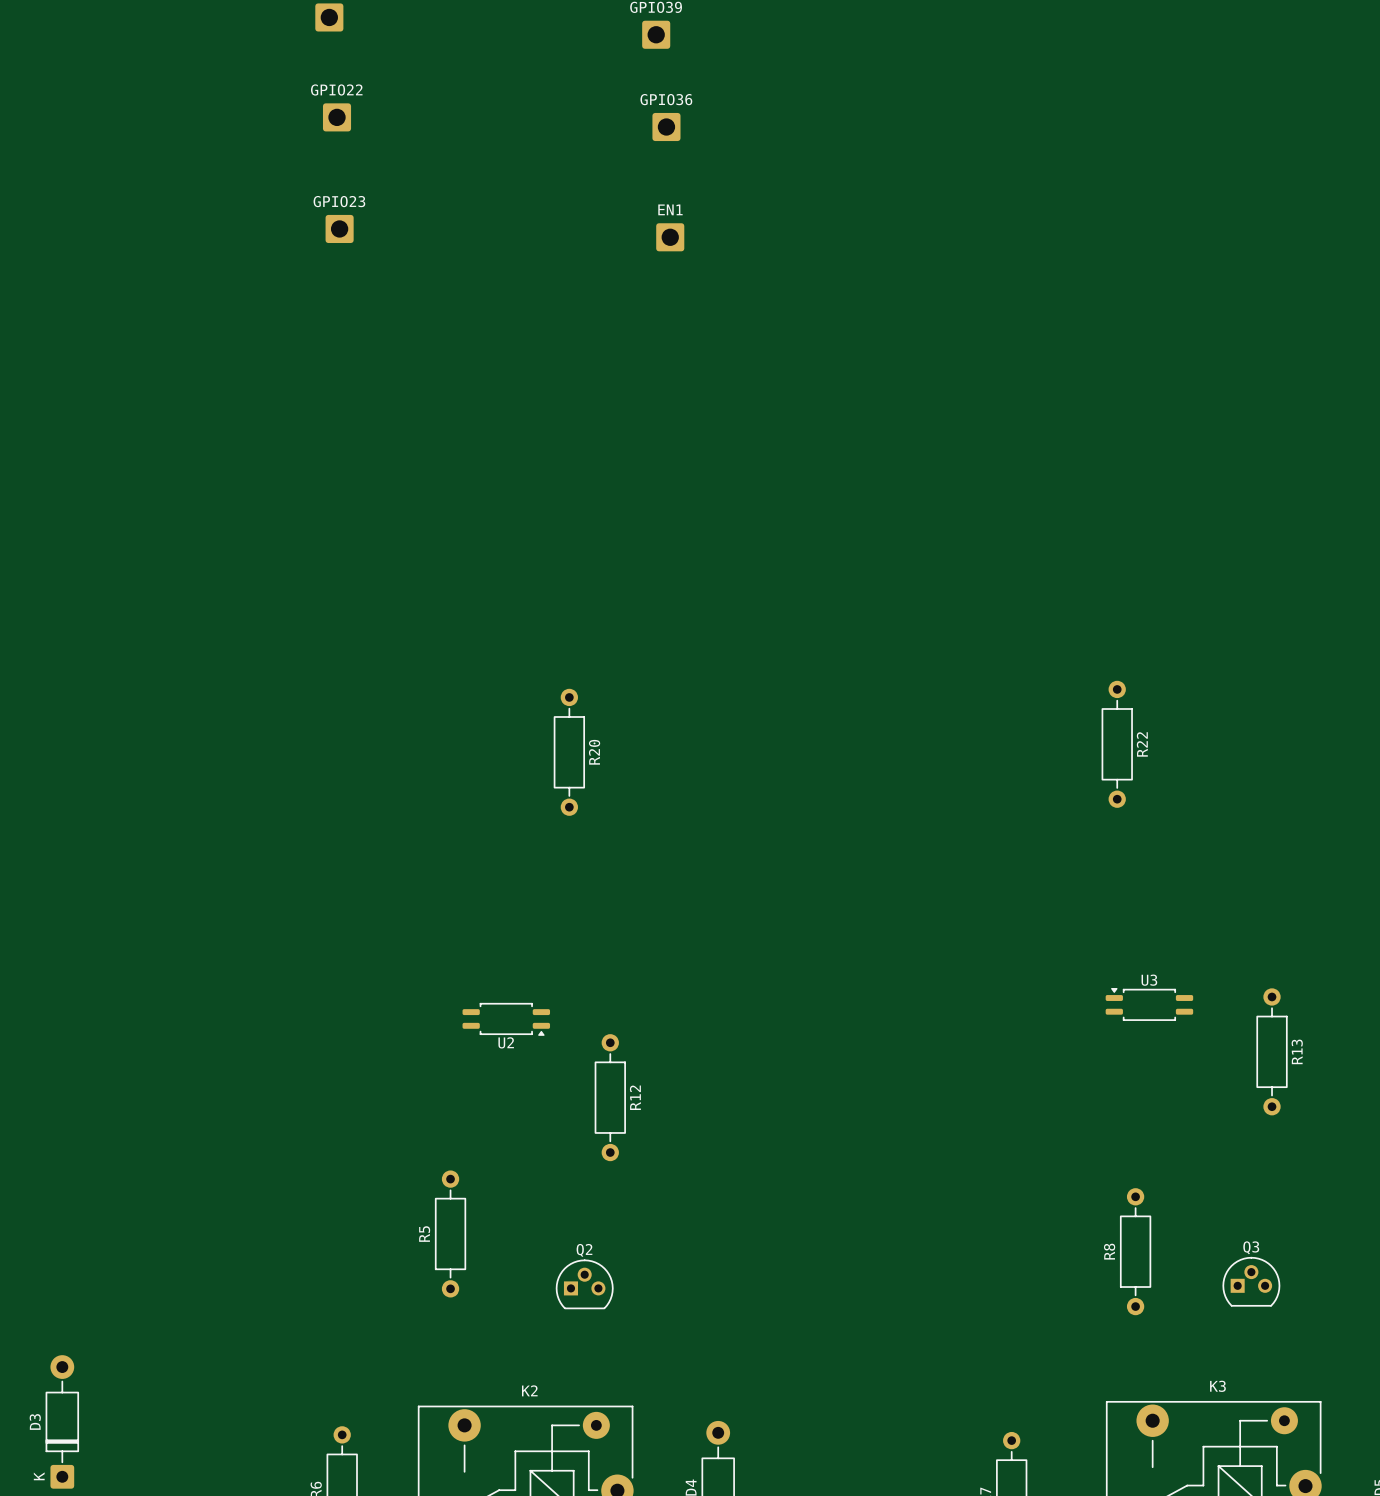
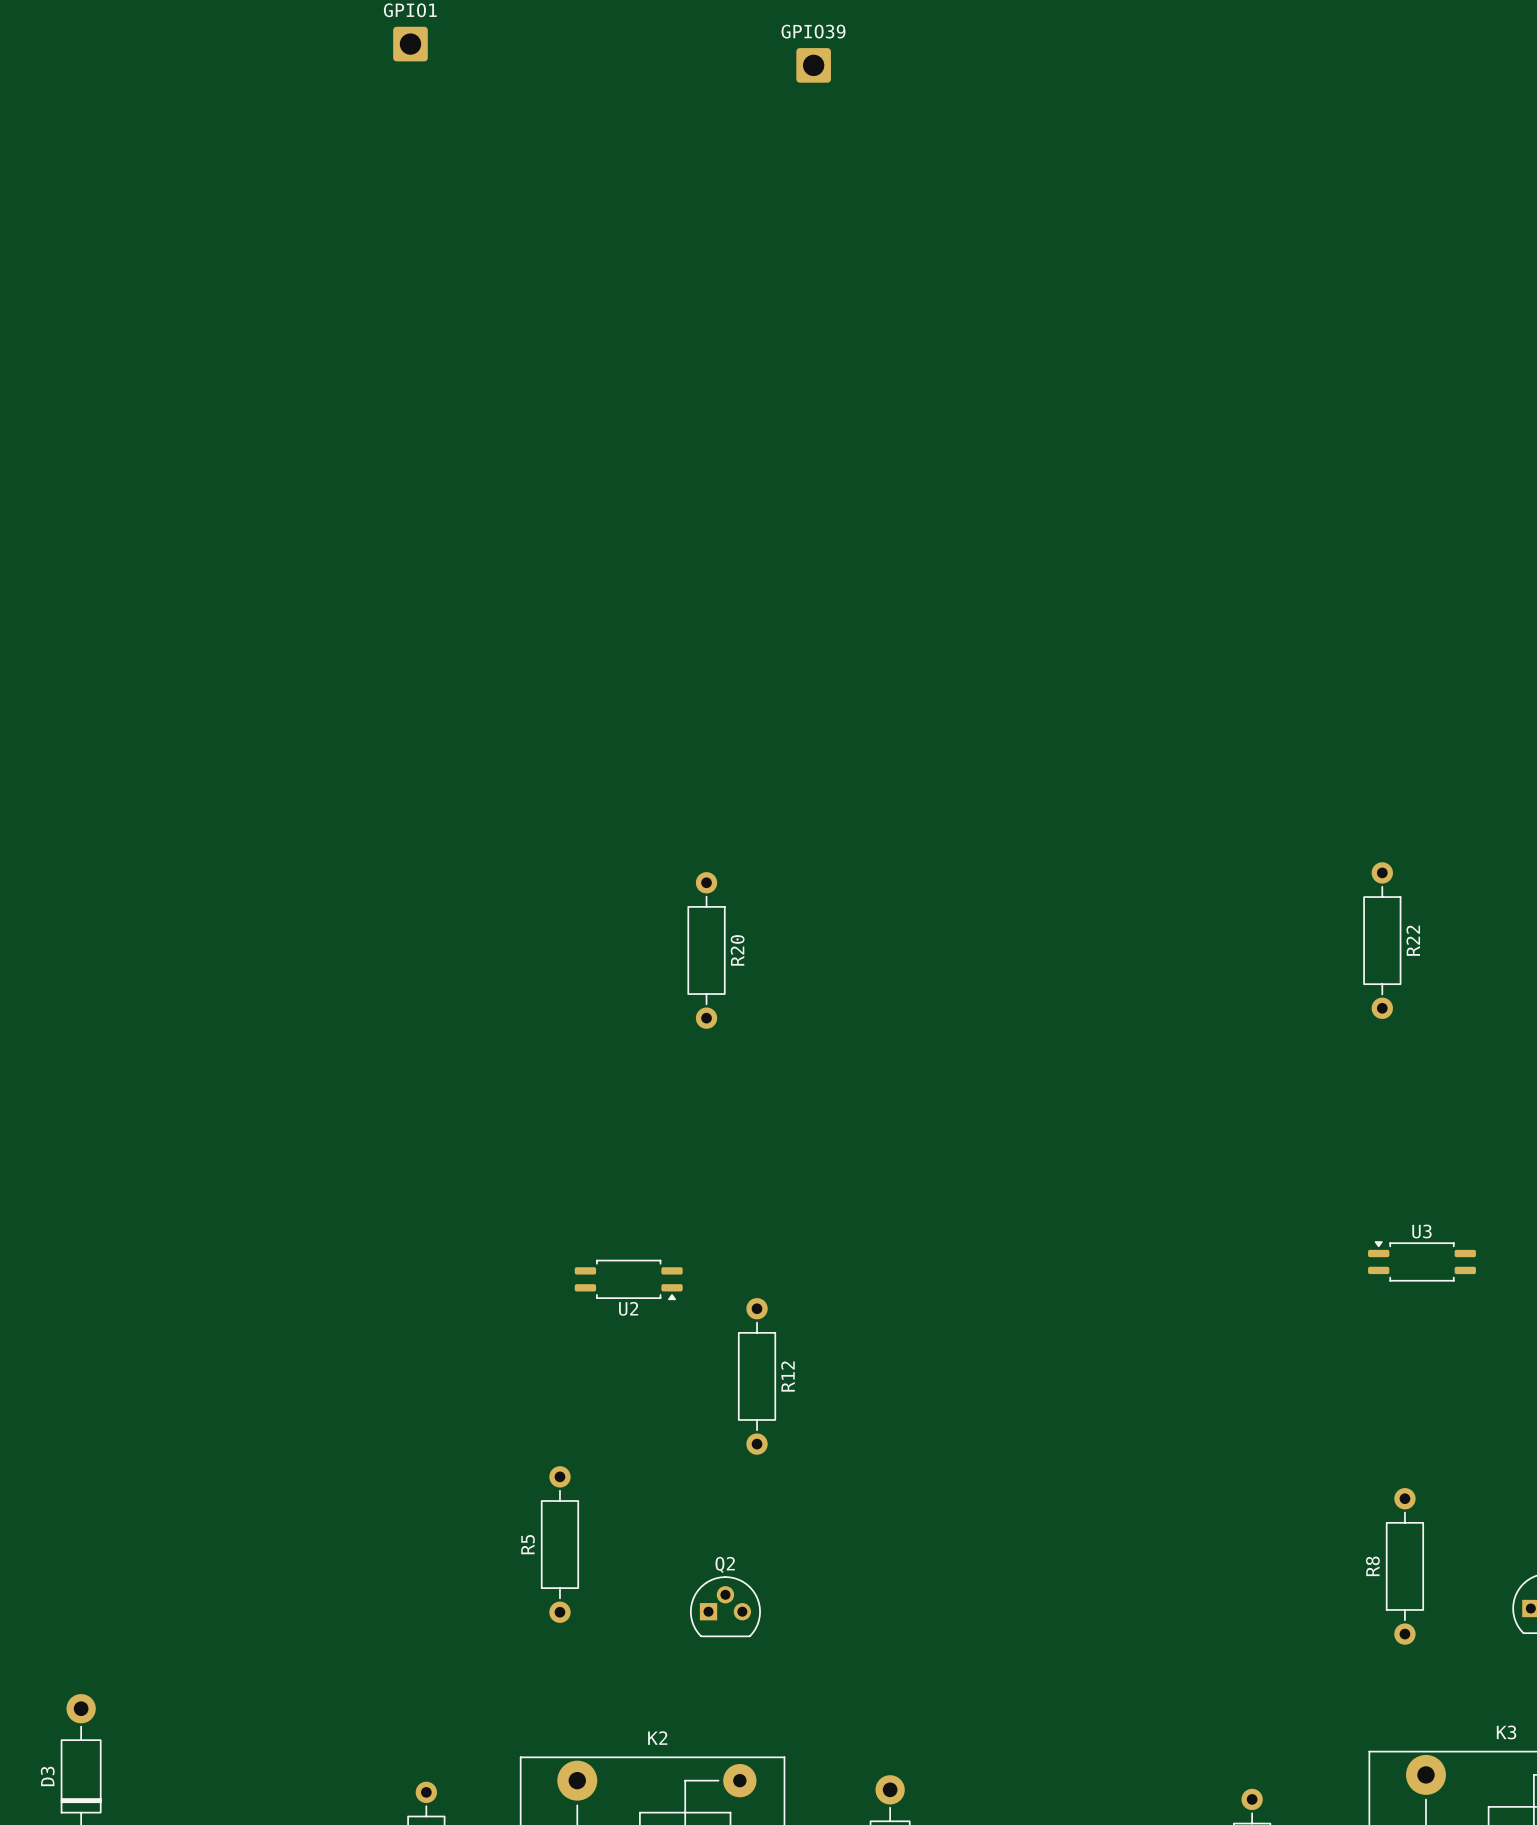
GPIO22: (337, 117) -> none
GPIO36: (666, 127) -> none
GPIO23: (339, 228) -> none
EN1: (670, 237) -> none

